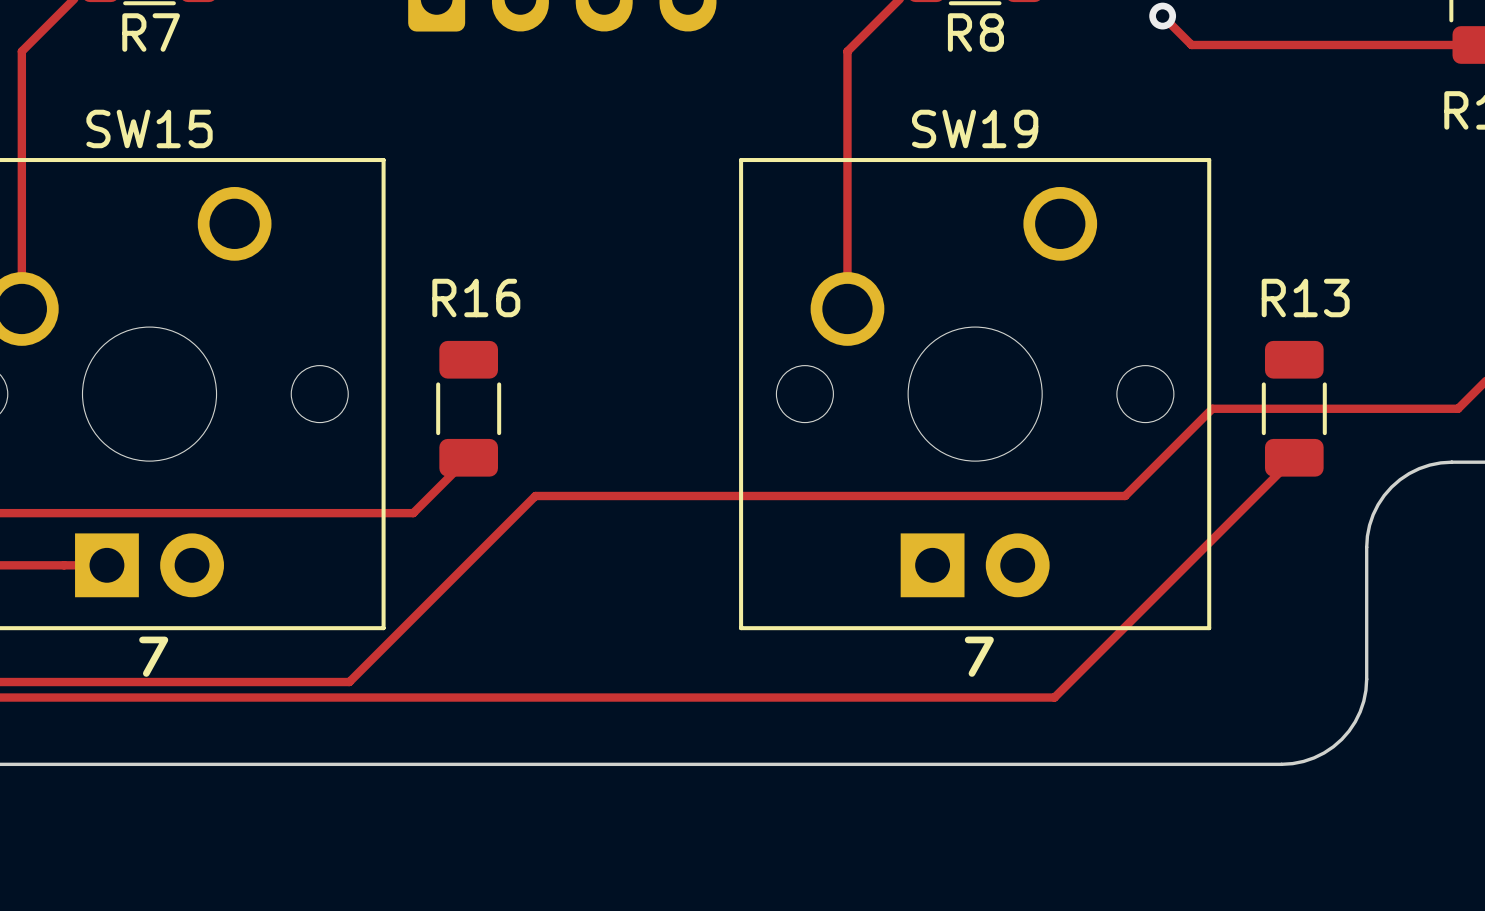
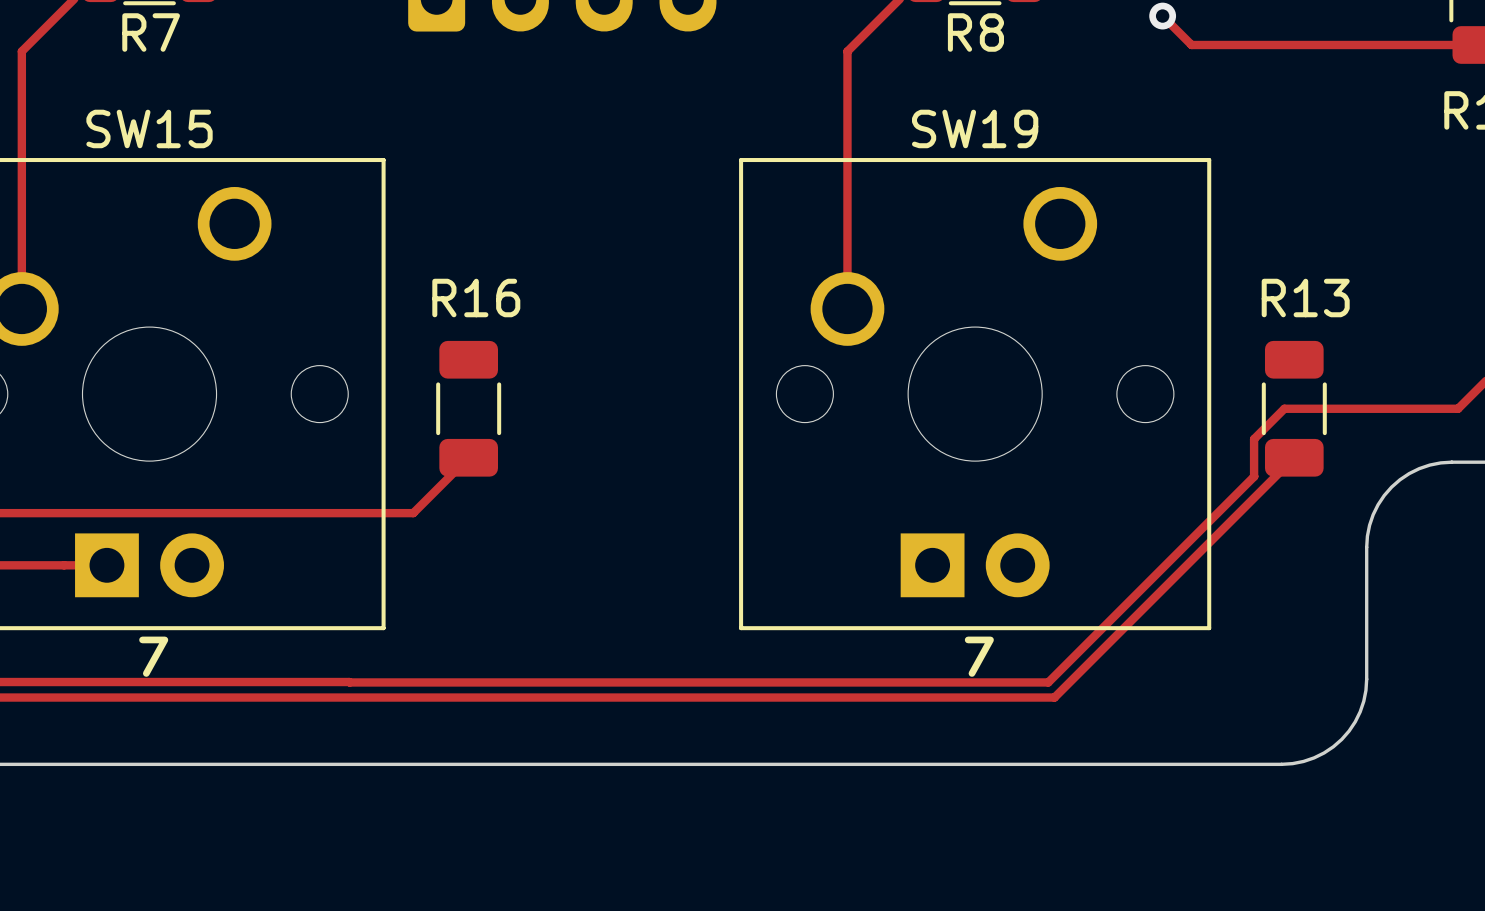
track: (1284, 408) (1212, 408) (1125, 496) (535, 496) (349, 682) -> (1254, 476) (1048, 682) (349, 682)
track: none -> (1284, 408) (1254, 439) (1254, 476)

